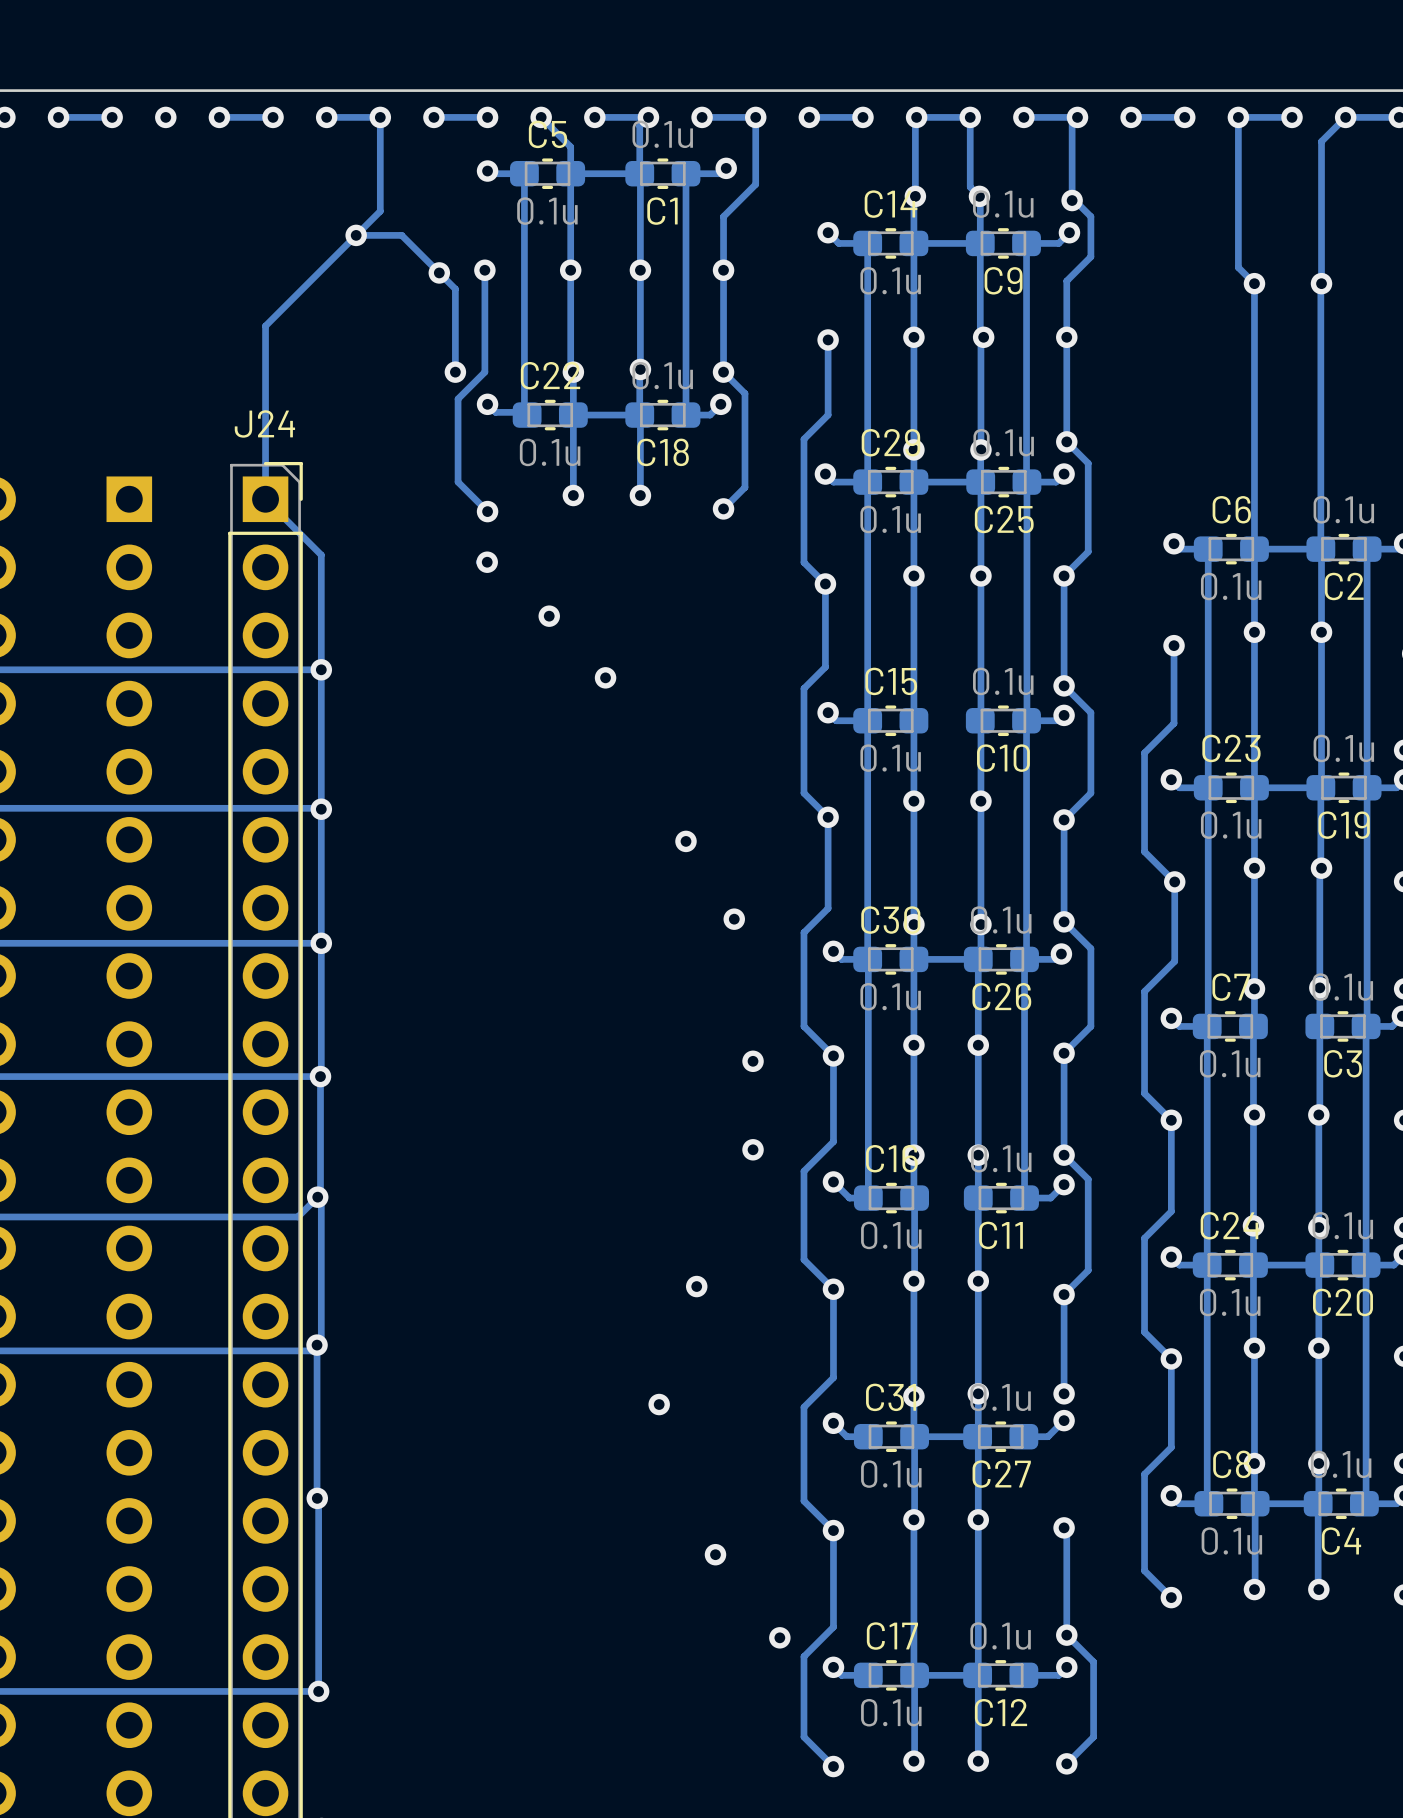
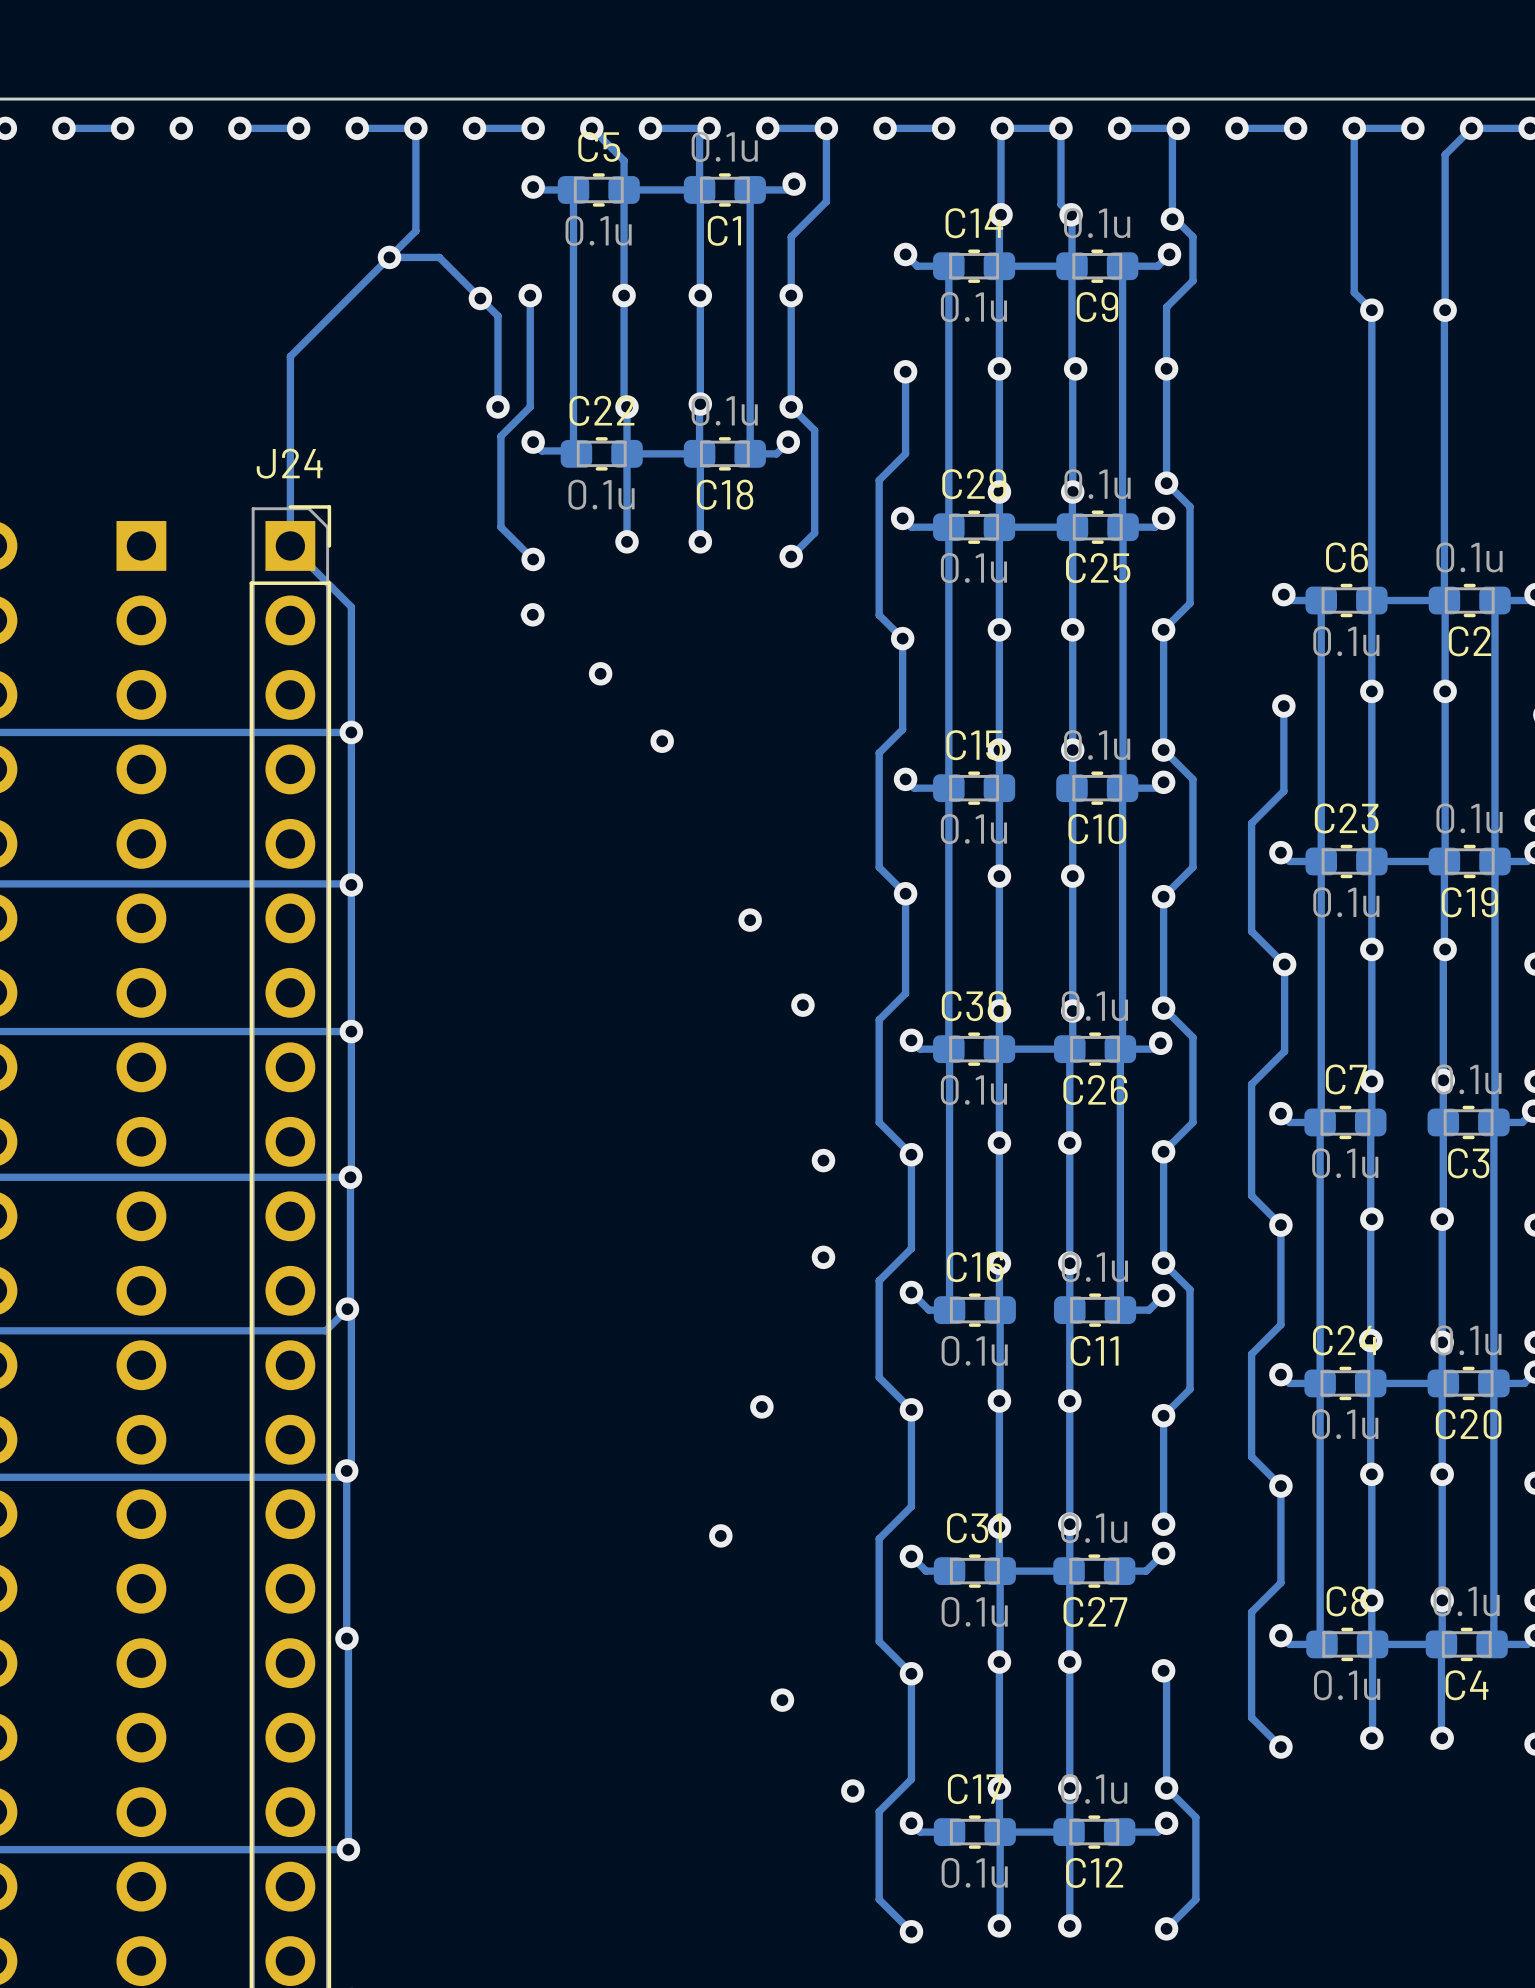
via: none -> (999, 750)
via: none -> (1072, 750)
via: none -> (999, 1788)
via: none -> (1069, 1788)

